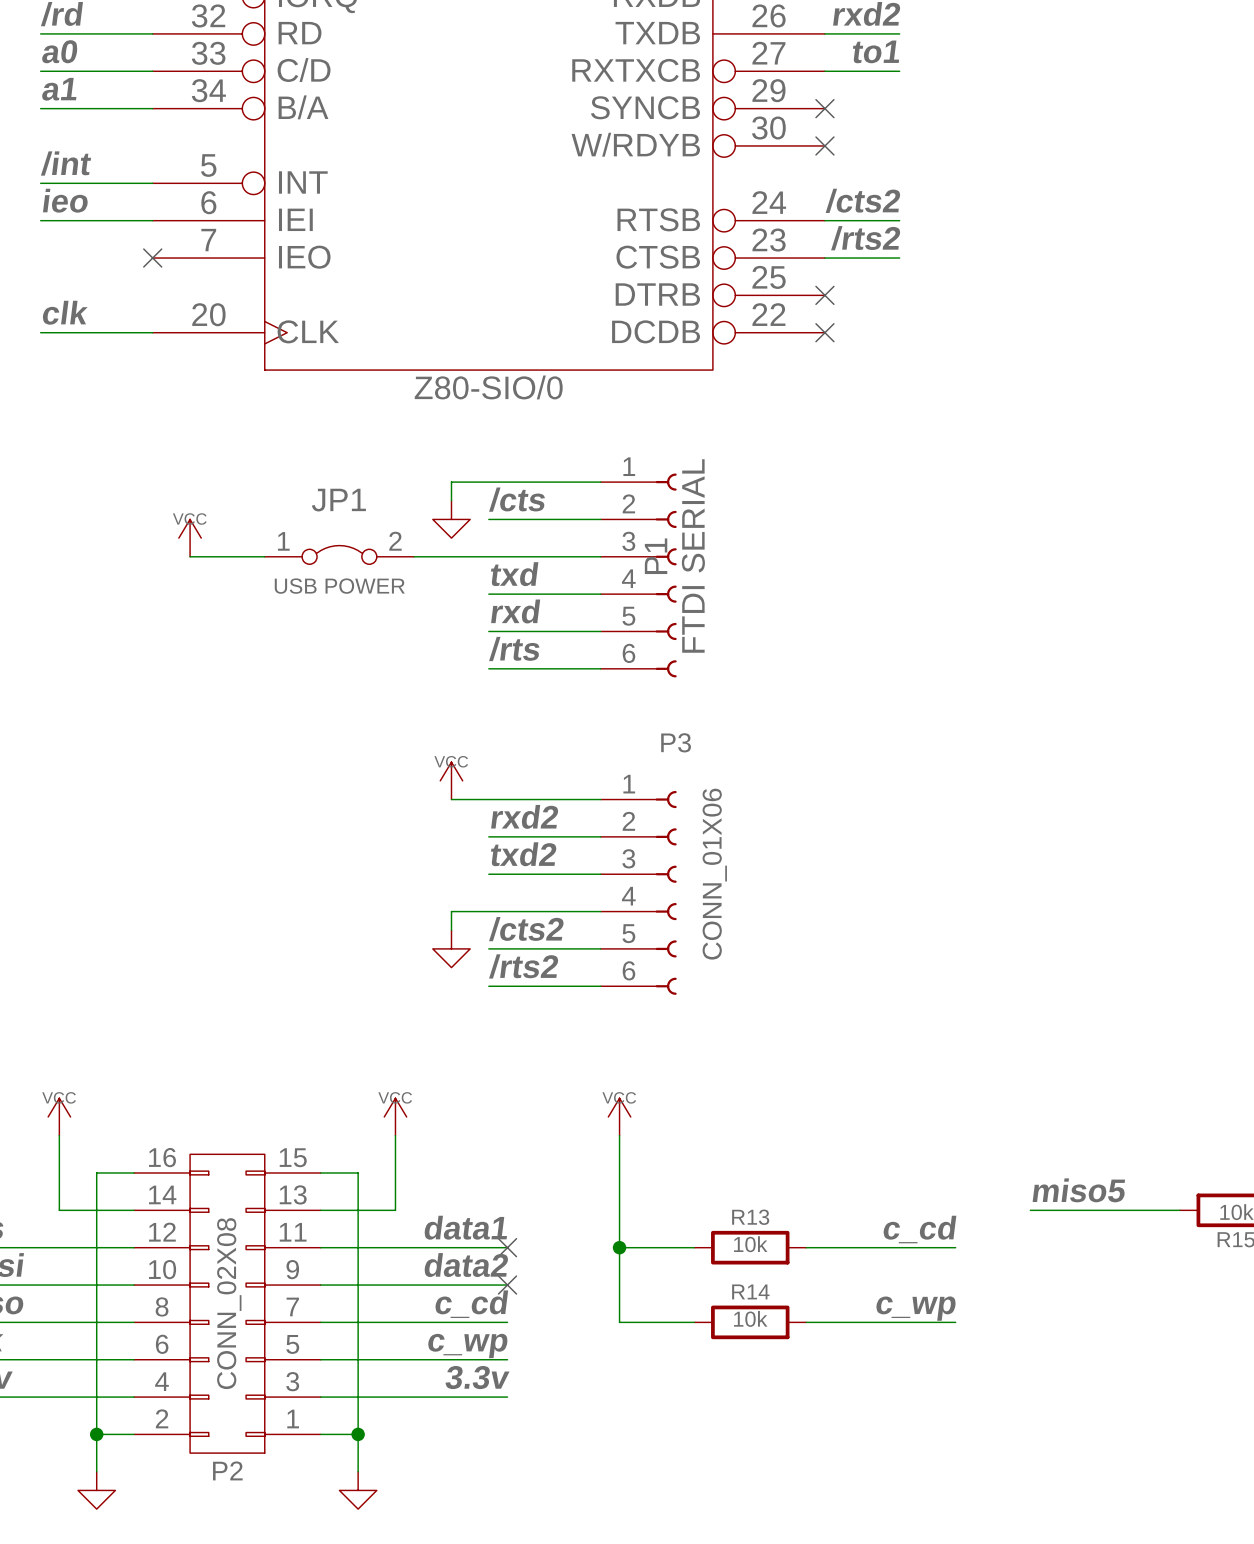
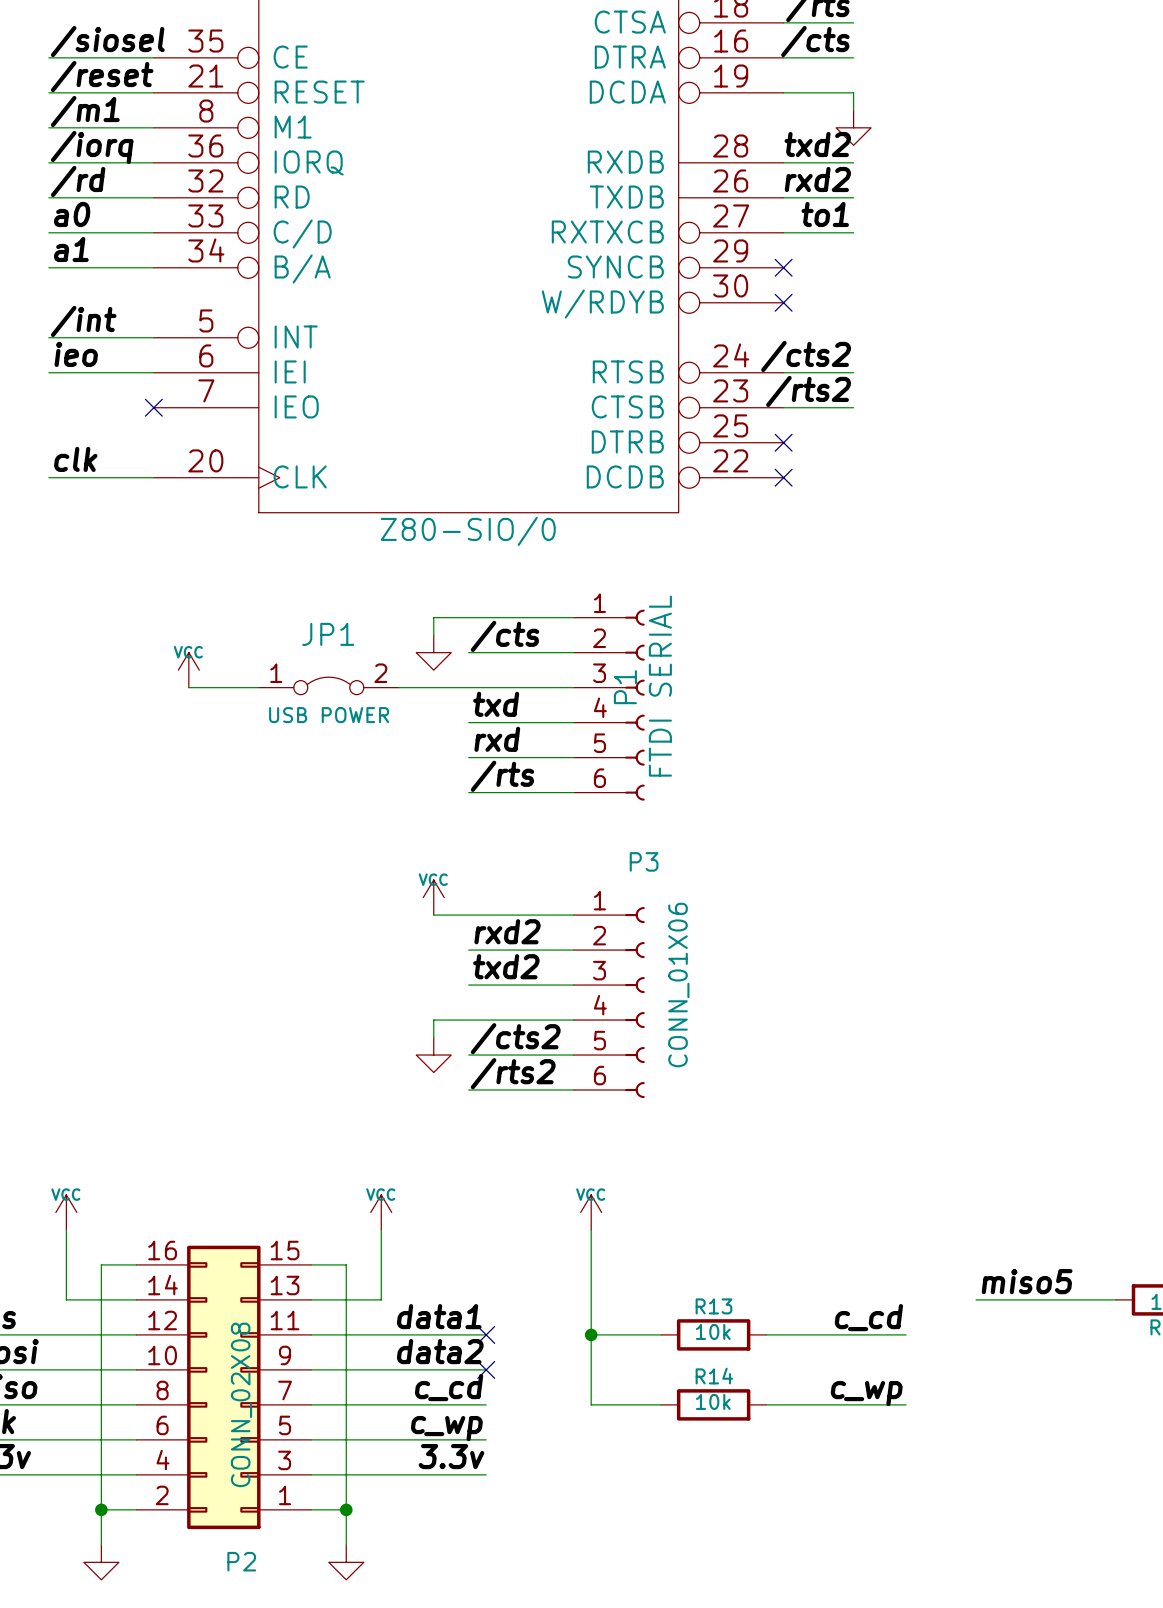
P2 symbol: [134, 1154, 321, 1454] -> [136, 1245, 312, 1530]

